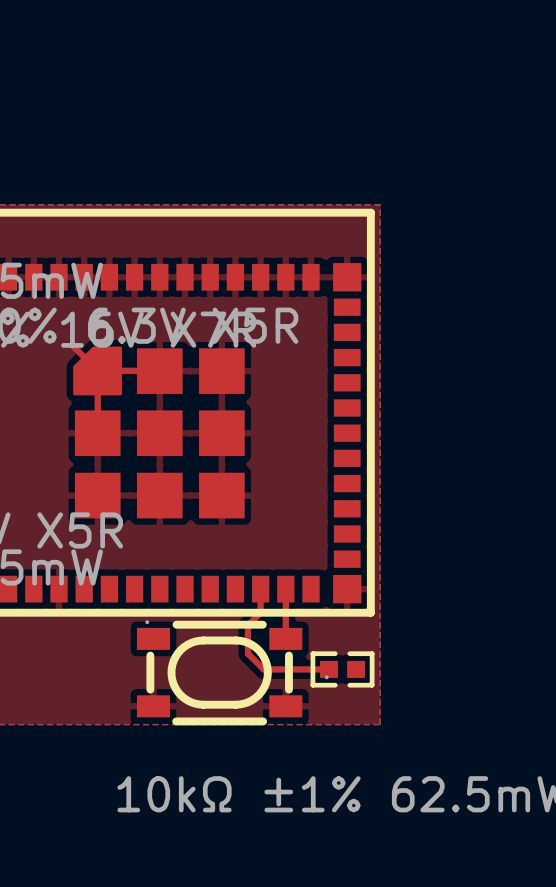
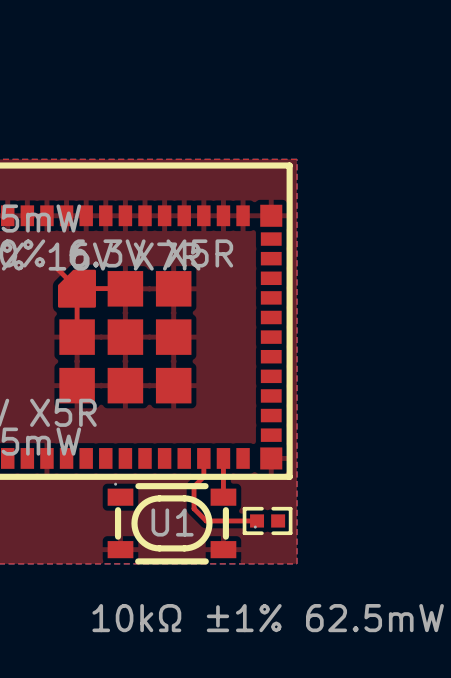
U1: none -> (171, 523)

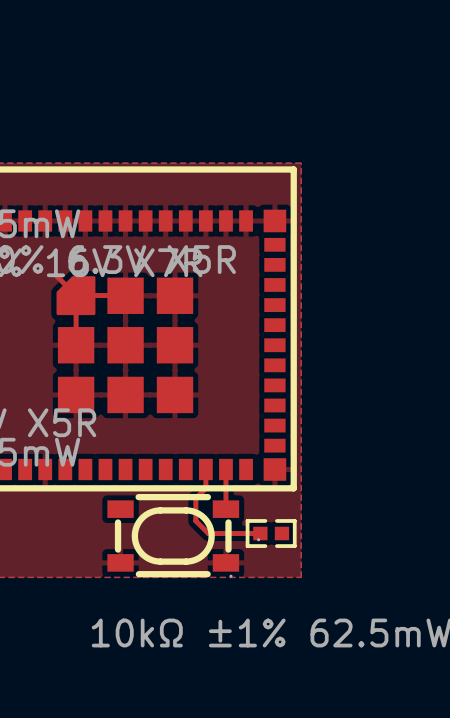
U1: (171, 523) -> none
part: none -> (173, 535)

